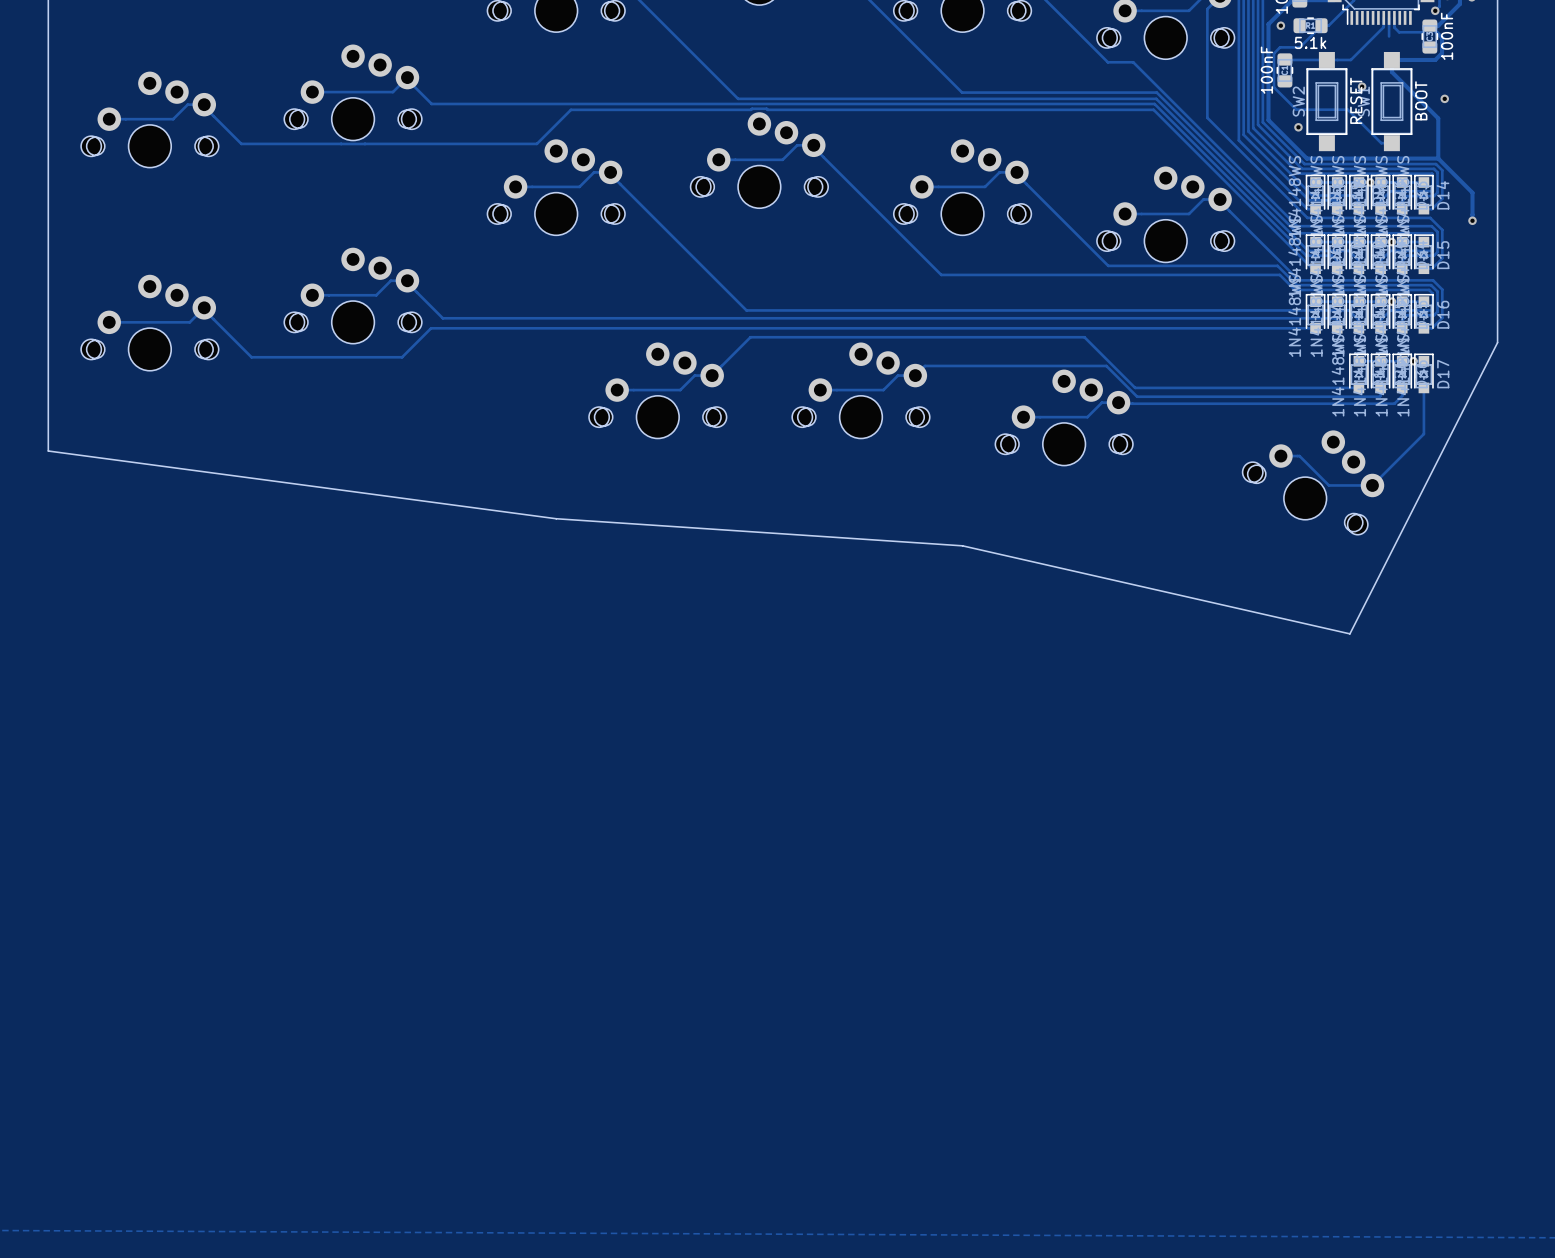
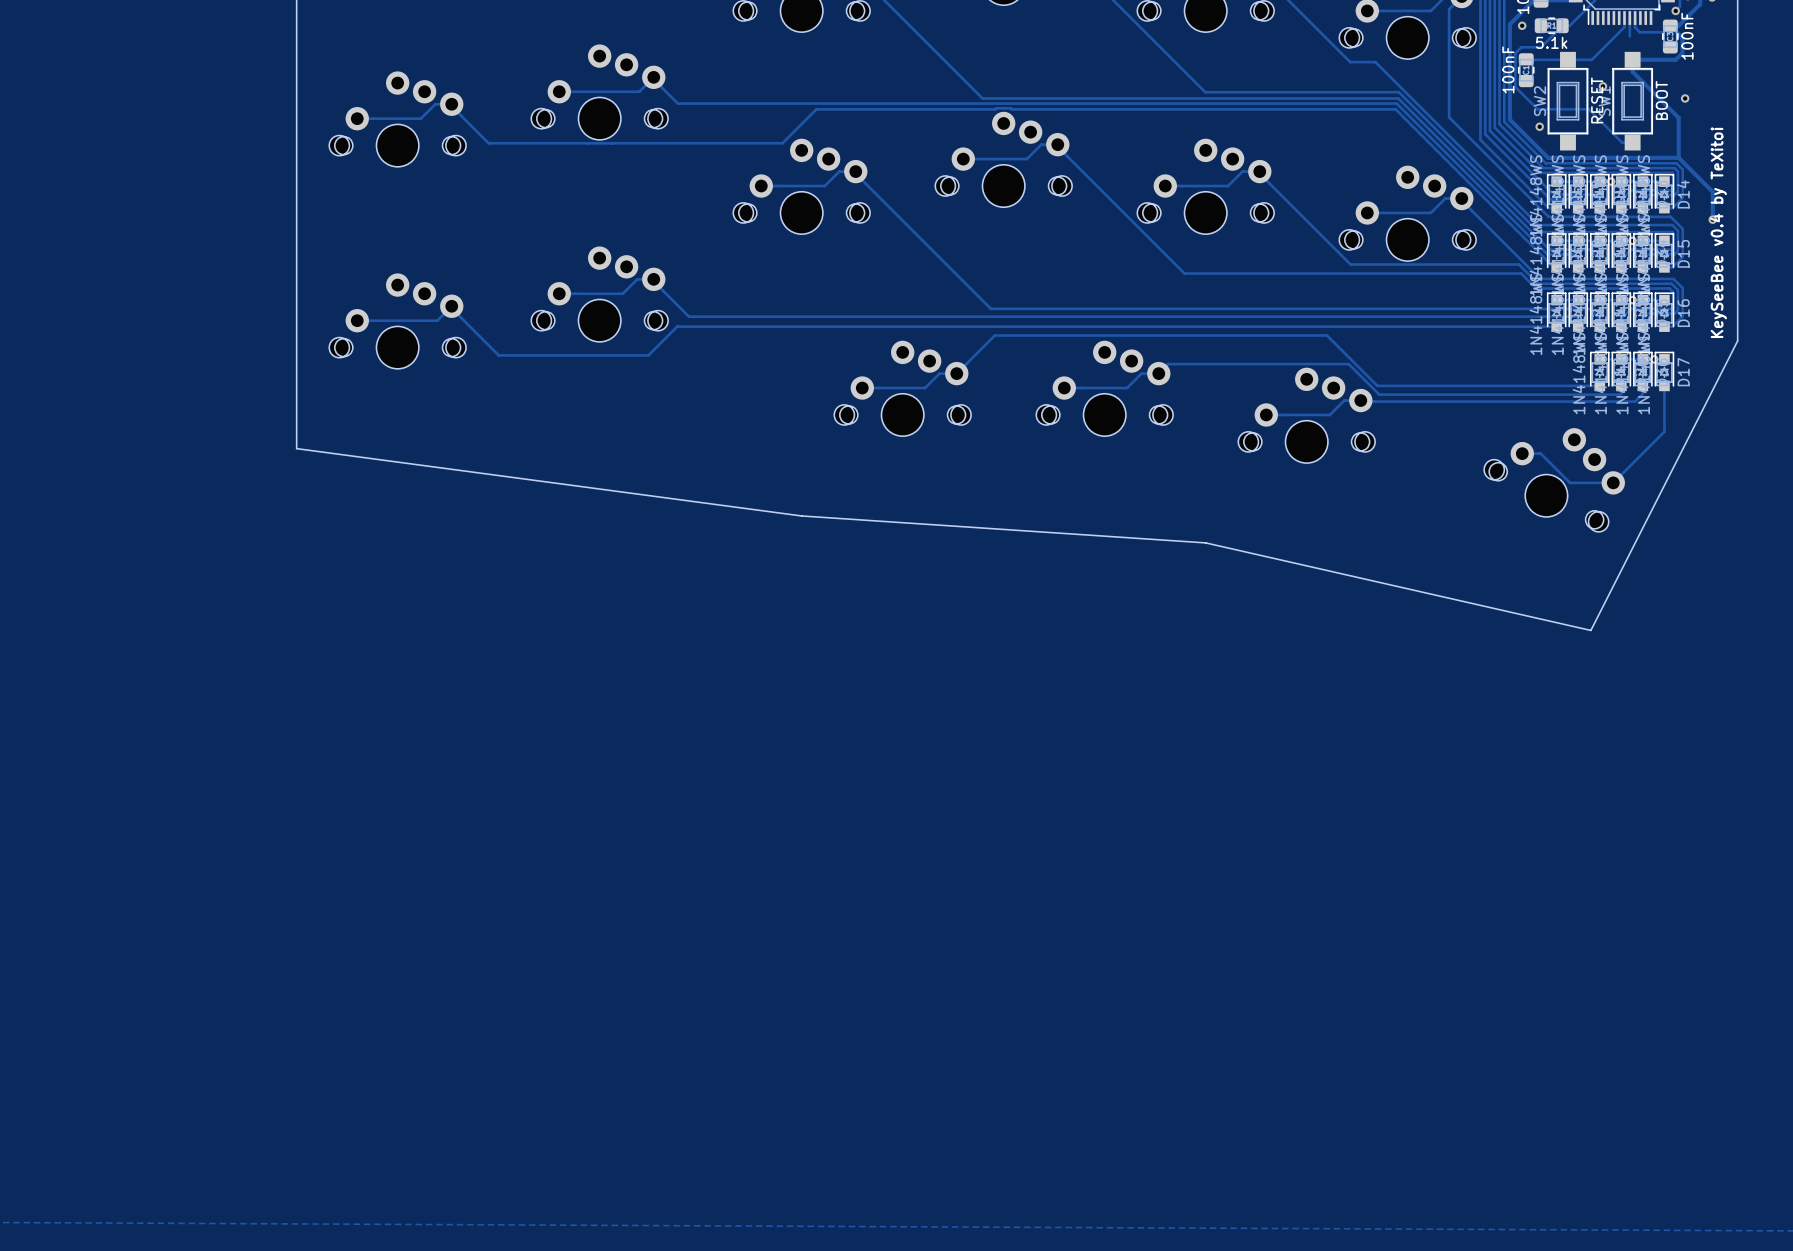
text: none -> KeySeeBee v0.4 by TeXitoi (1718, 232)

